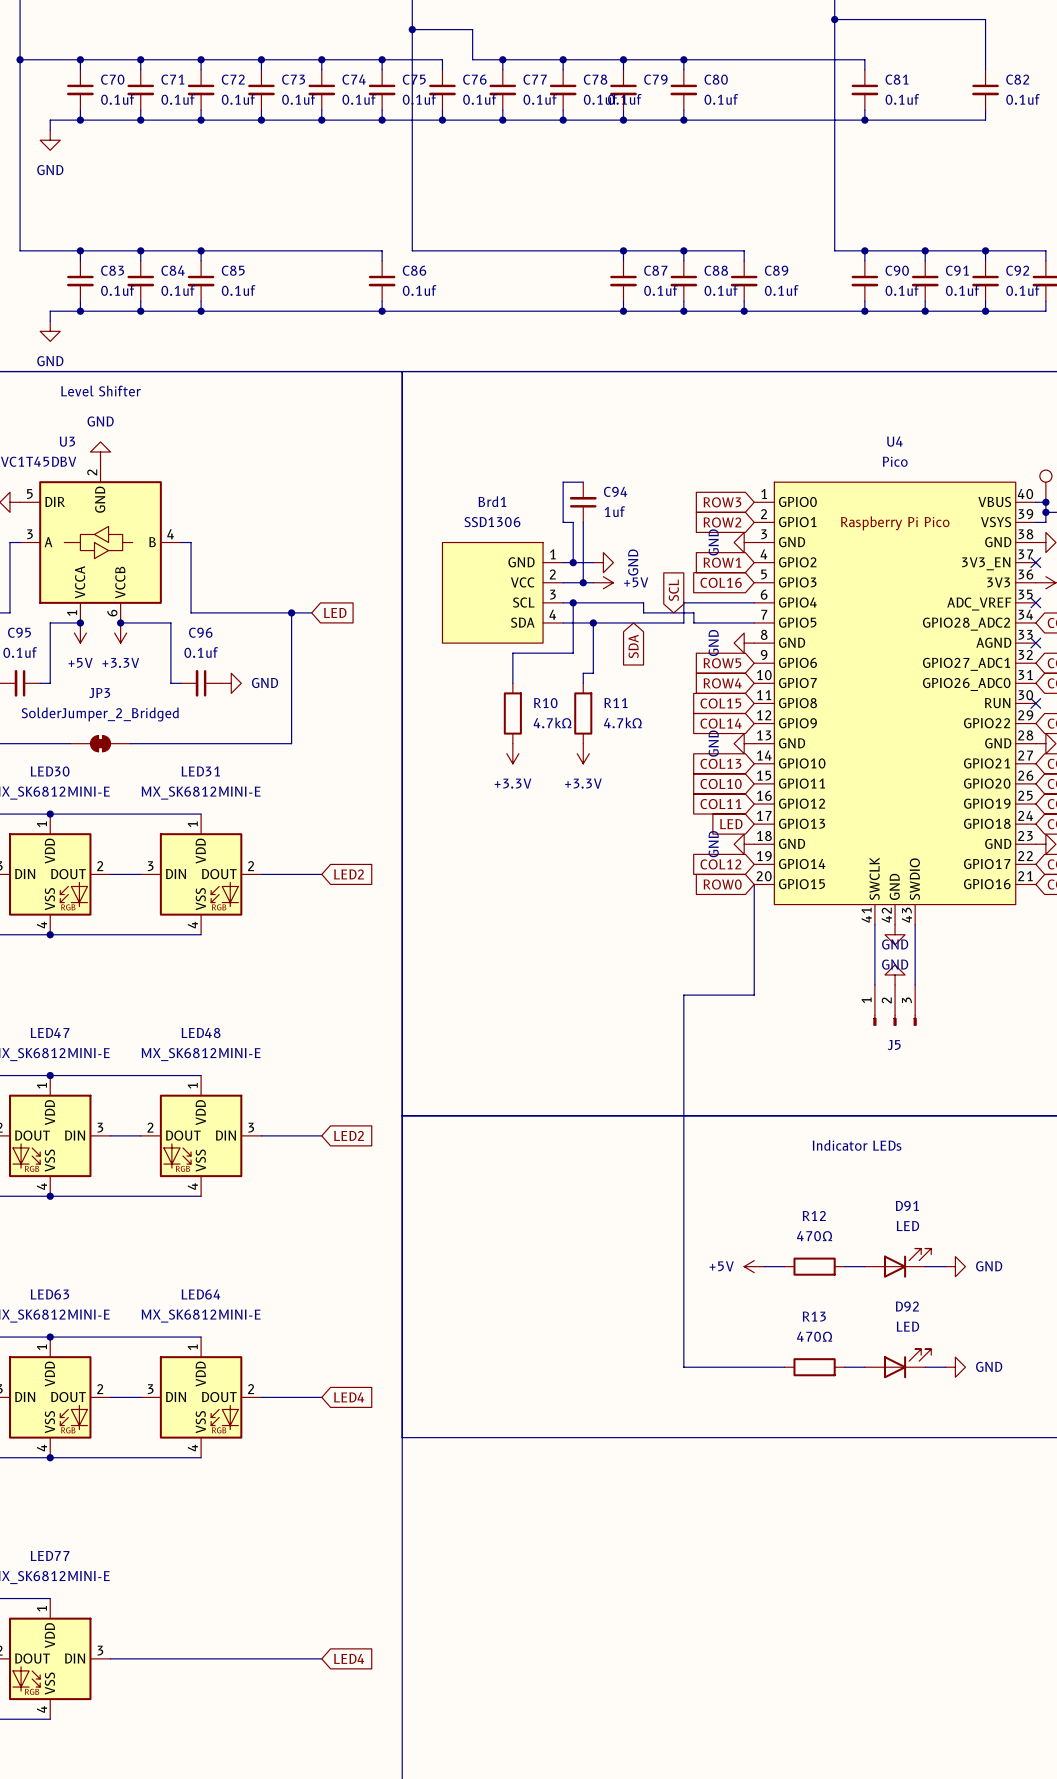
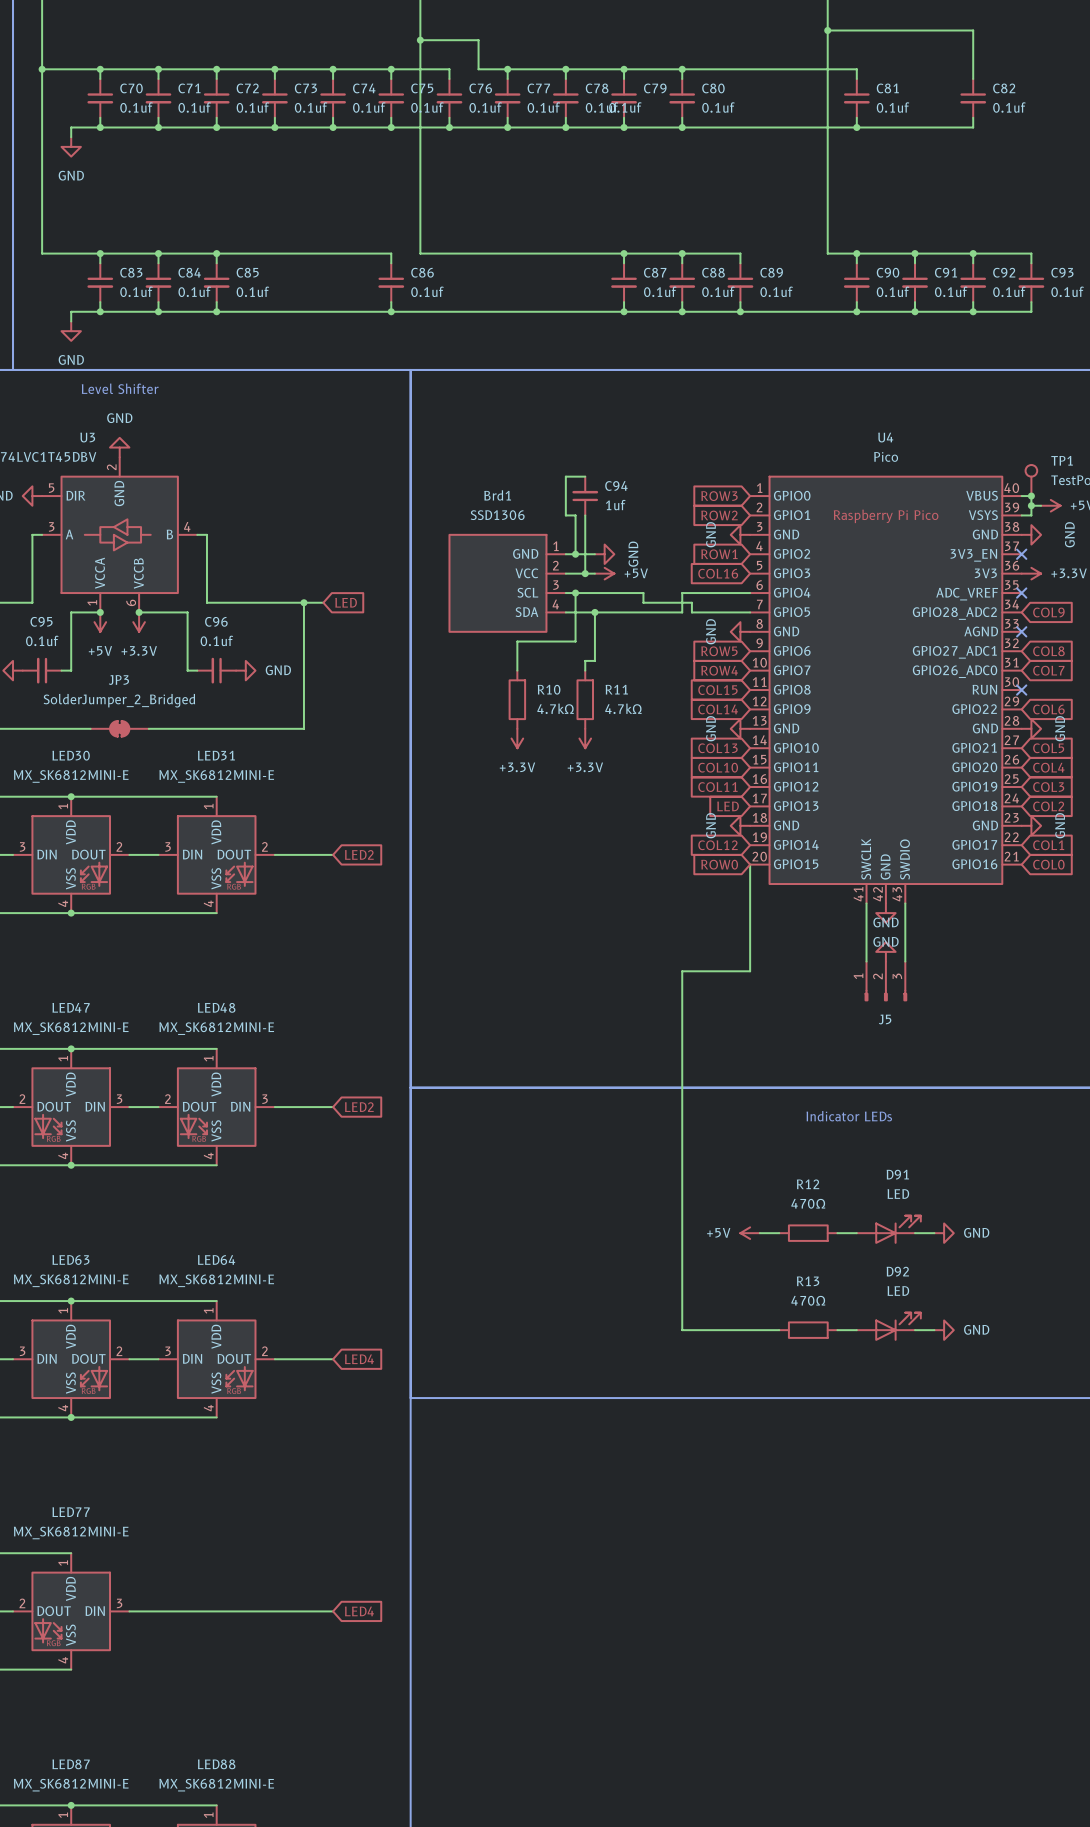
global label: SCL (673, 590) -> none
global label: SDA (633, 646) -> none

